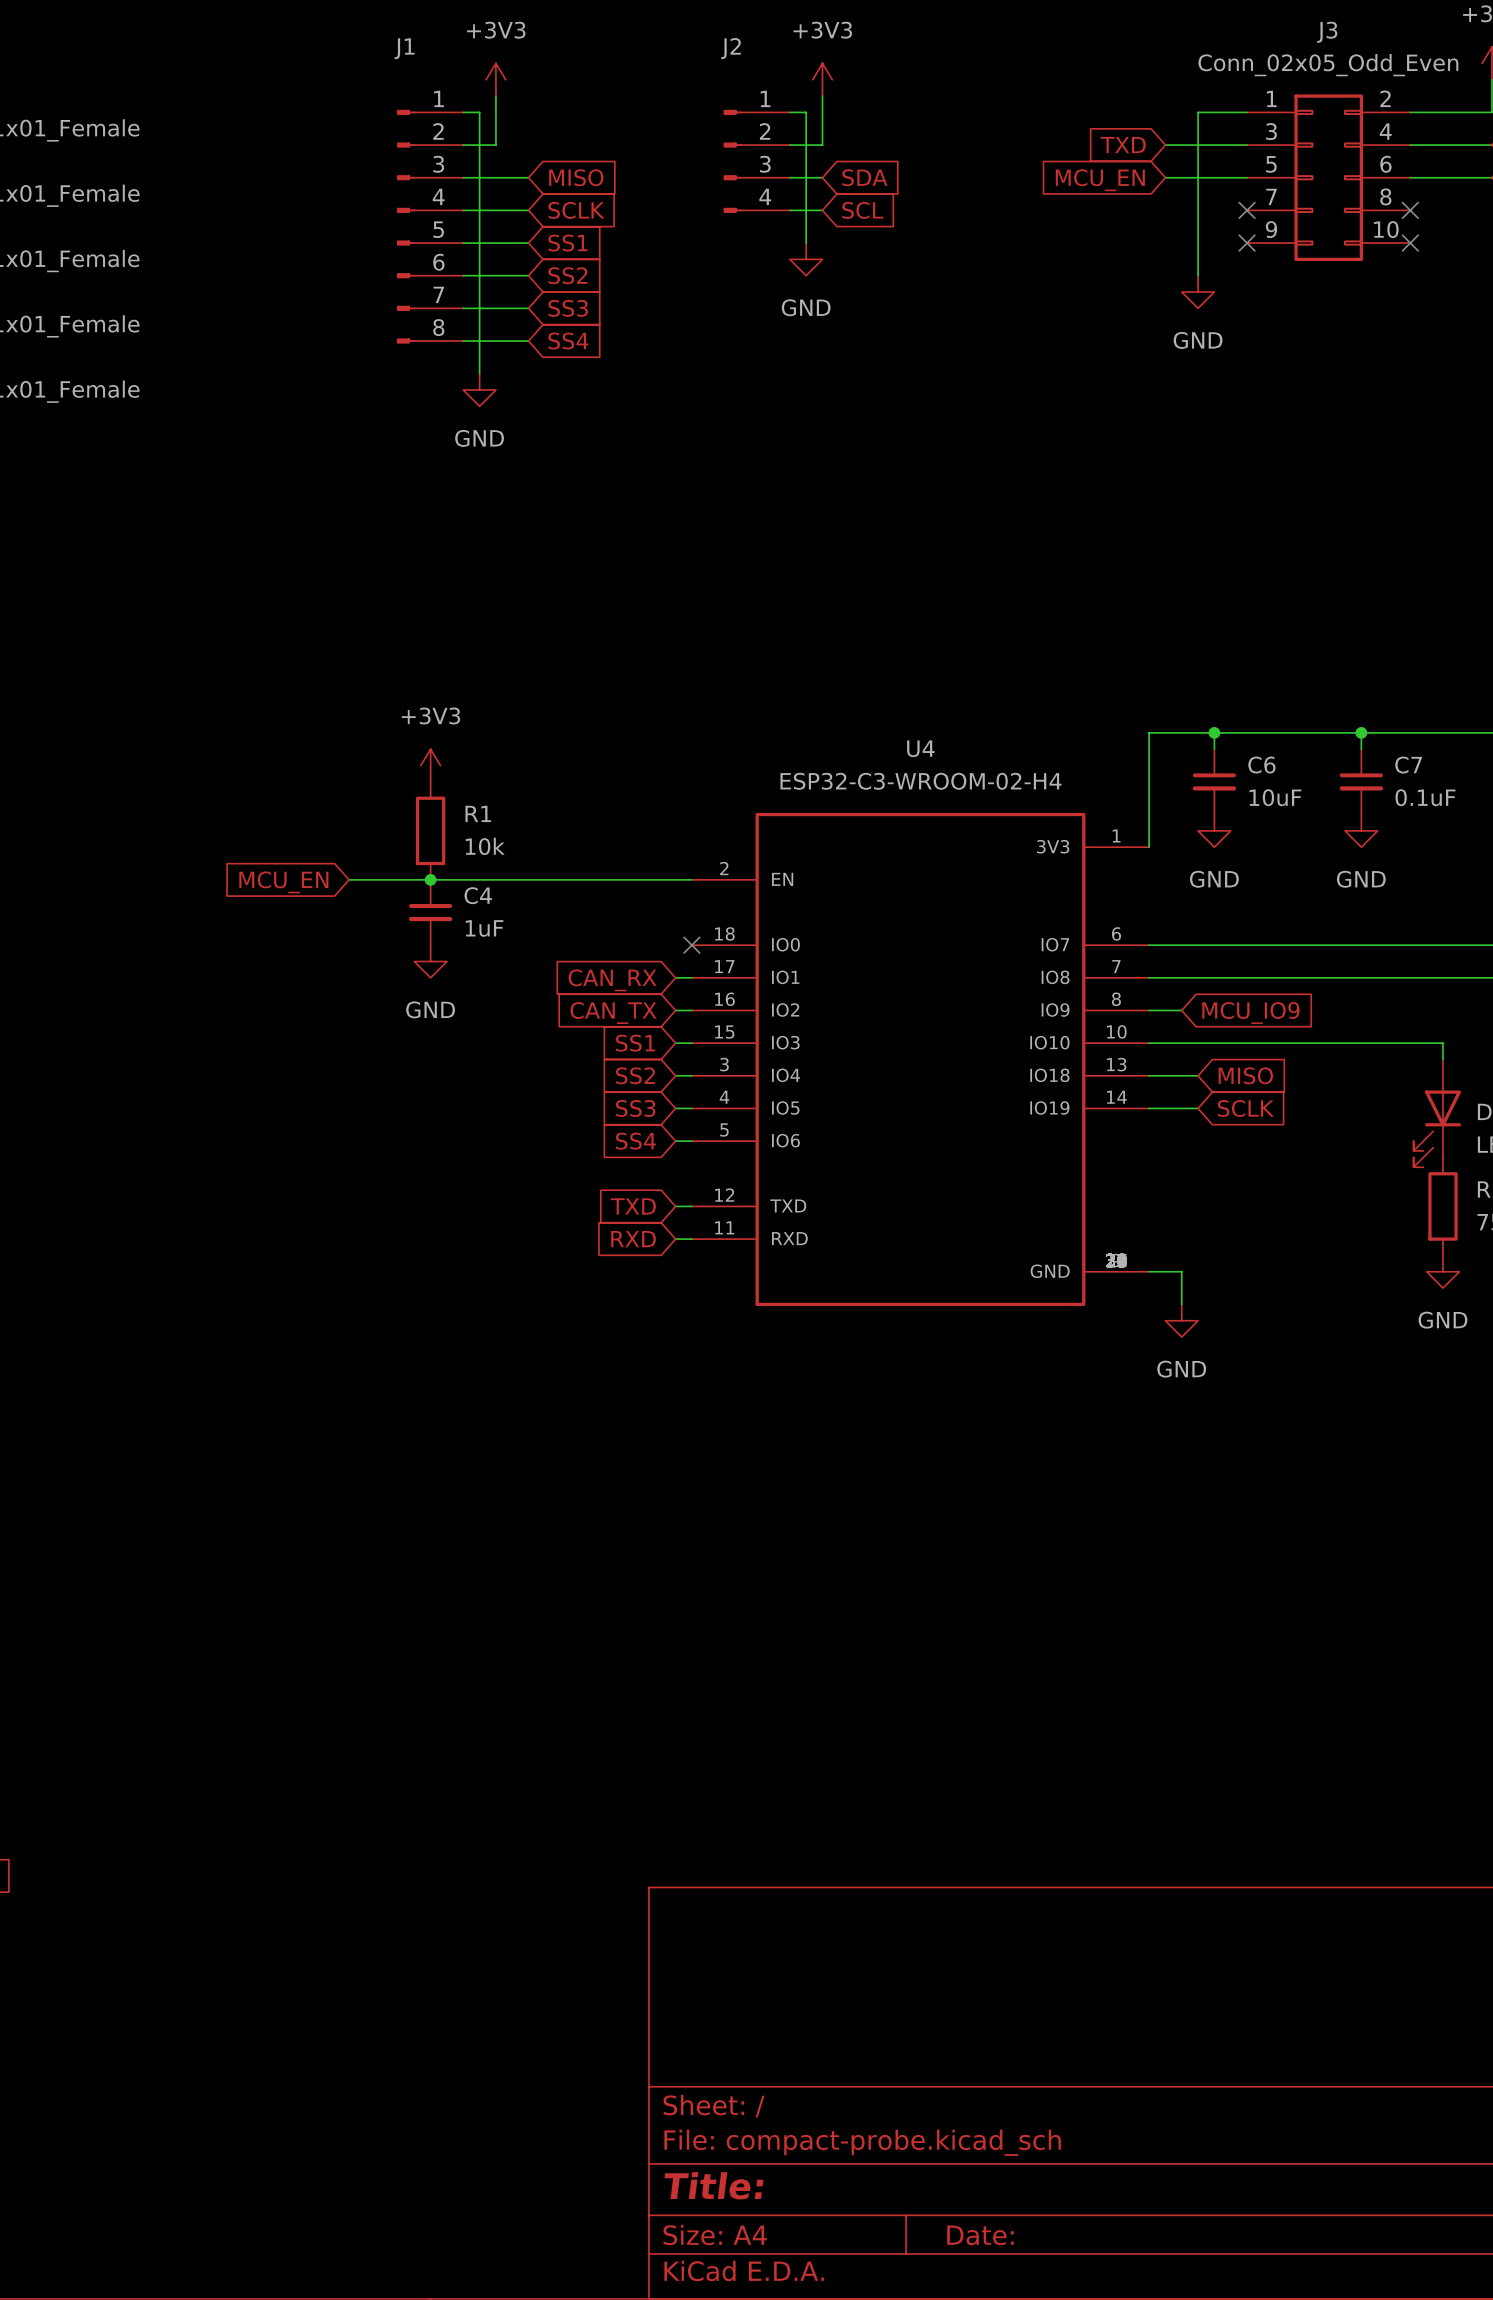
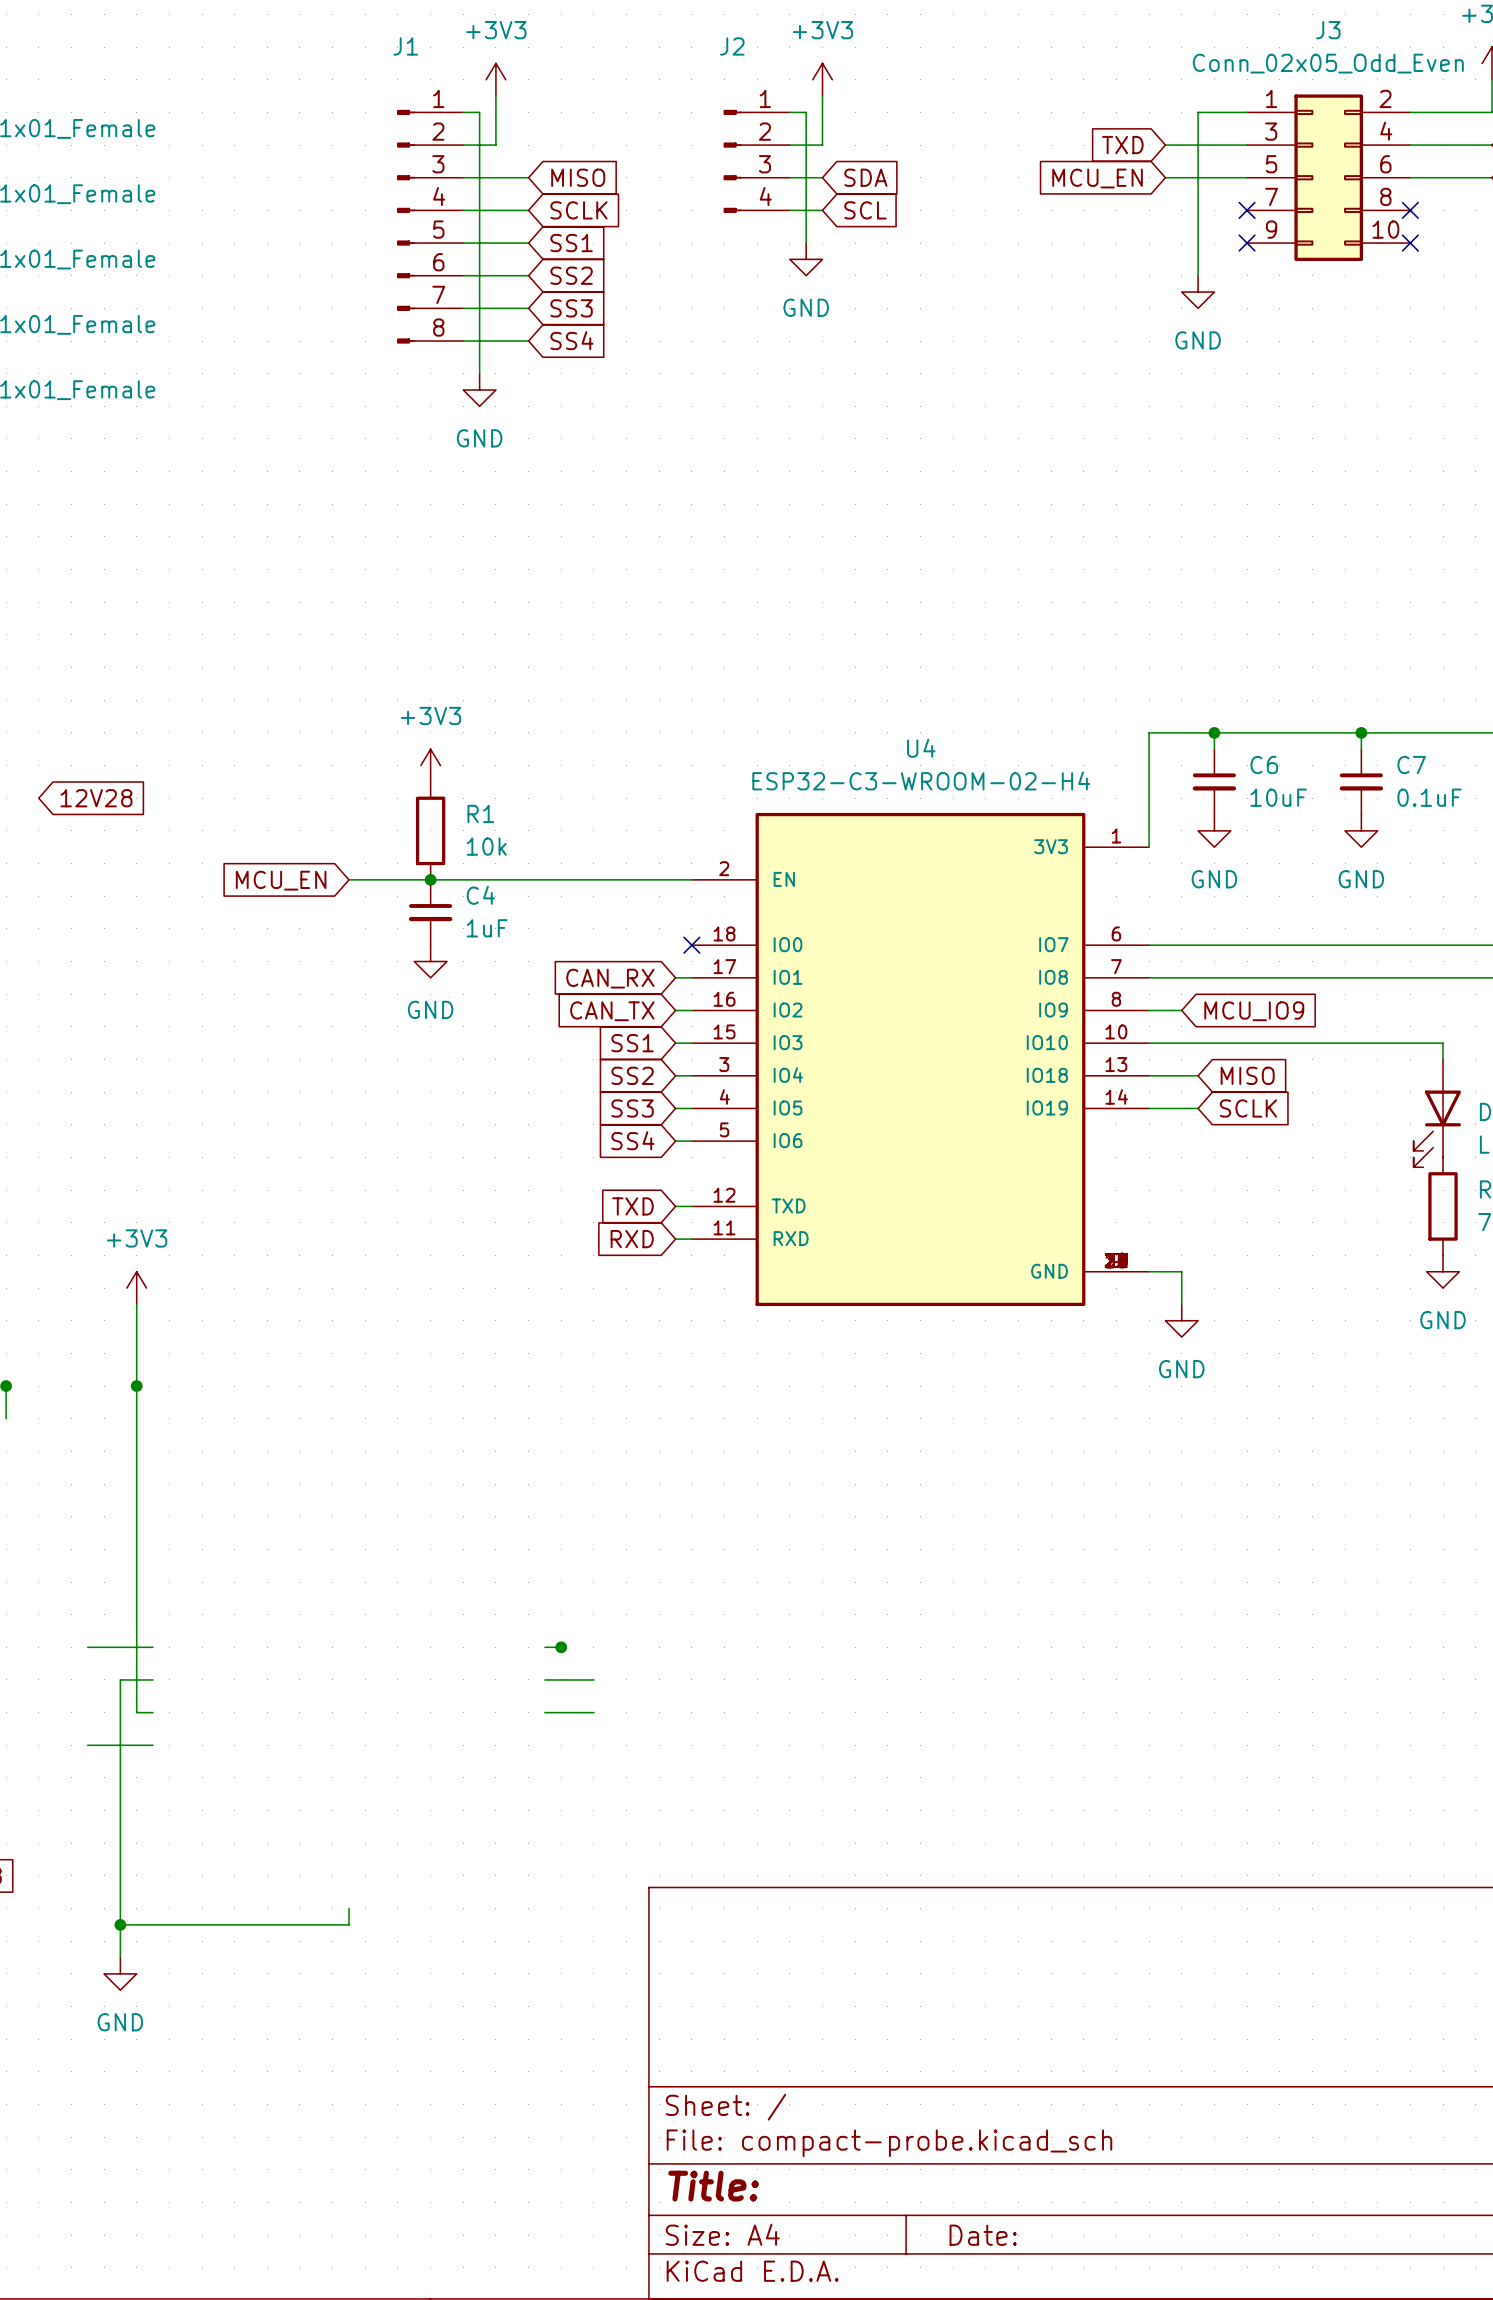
global label: none -> 12V28 (96, 798)
power symbol: none -> +3V3 (136, 1288)
wire: none -> (136, 1304) (136, 1712) (153, 1712)
wire: none -> (6, 1386) (6, 1418)
junction: none -> (6, 1386)
junction: none -> (136, 1386)
wire: none -> (87, 1647) (153, 1647)
wire: none -> (544, 1647) (561, 1647)
junction: none -> (561, 1647)
wire: none -> (153, 1679) (120, 1679) (120, 1957)
wire: none -> (544, 1679) (593, 1679)
wire: none -> (544, 1712) (593, 1712)
wire: none -> (87, 1745) (153, 1745)
wire: none -> (348, 1908) (348, 1924) (120, 1924)
junction: none -> (120, 1924)
power symbol: none -> GND (120, 1973)

